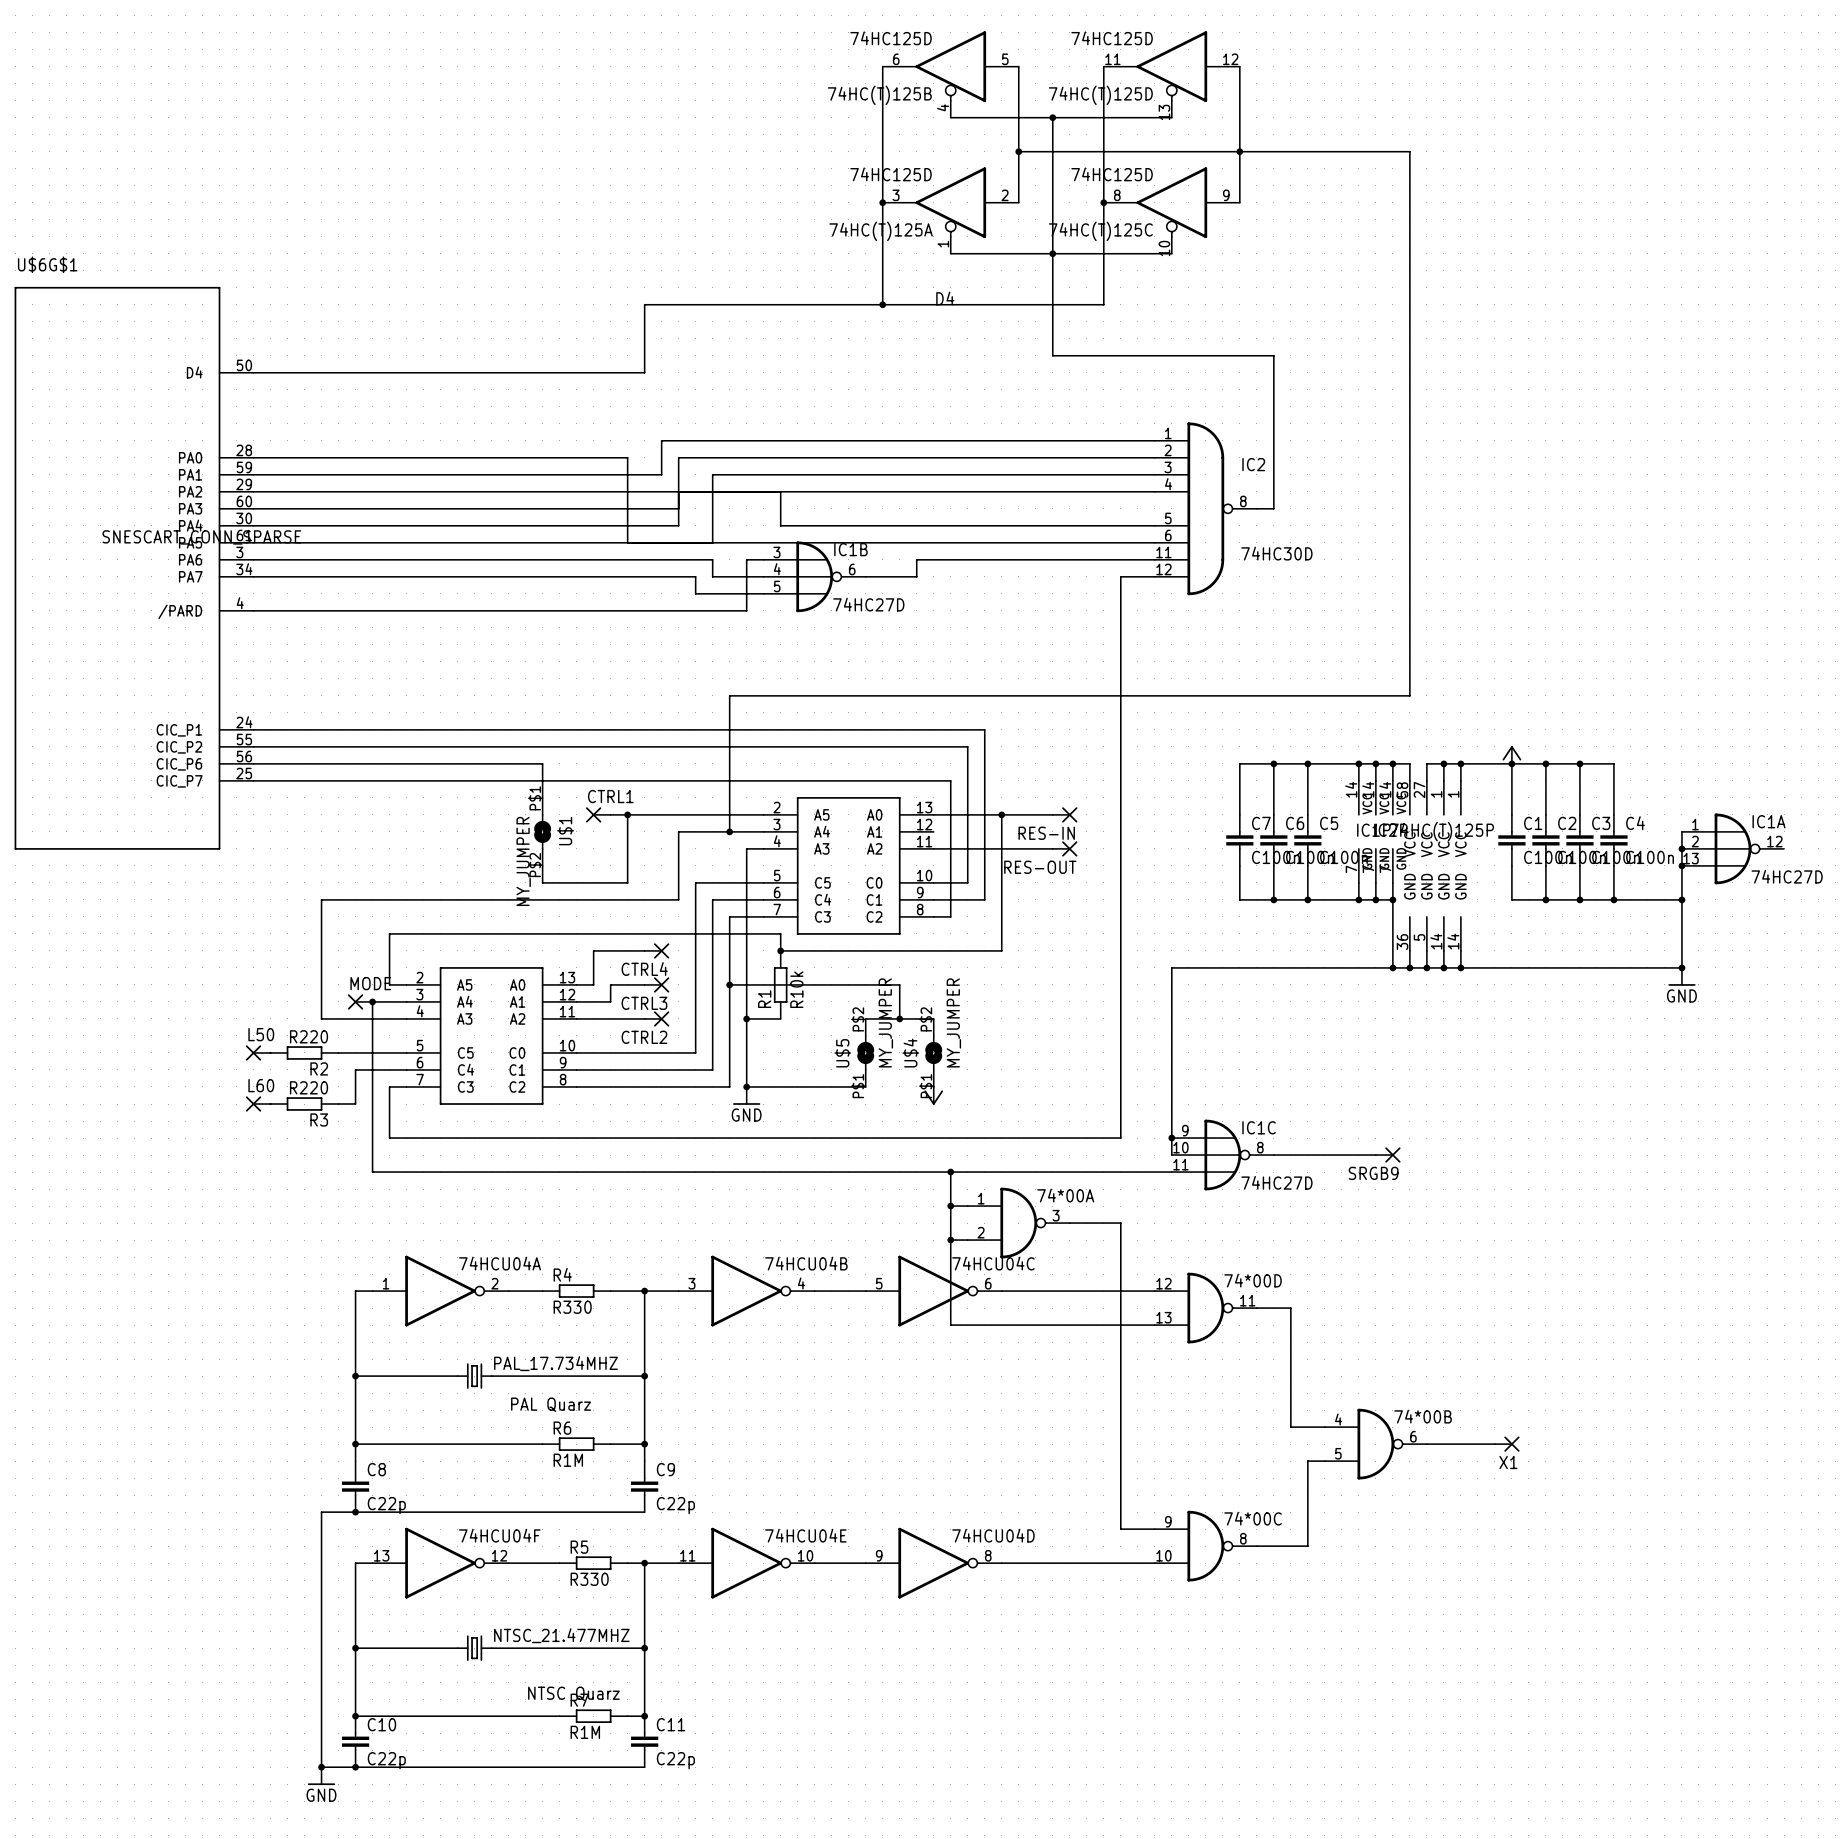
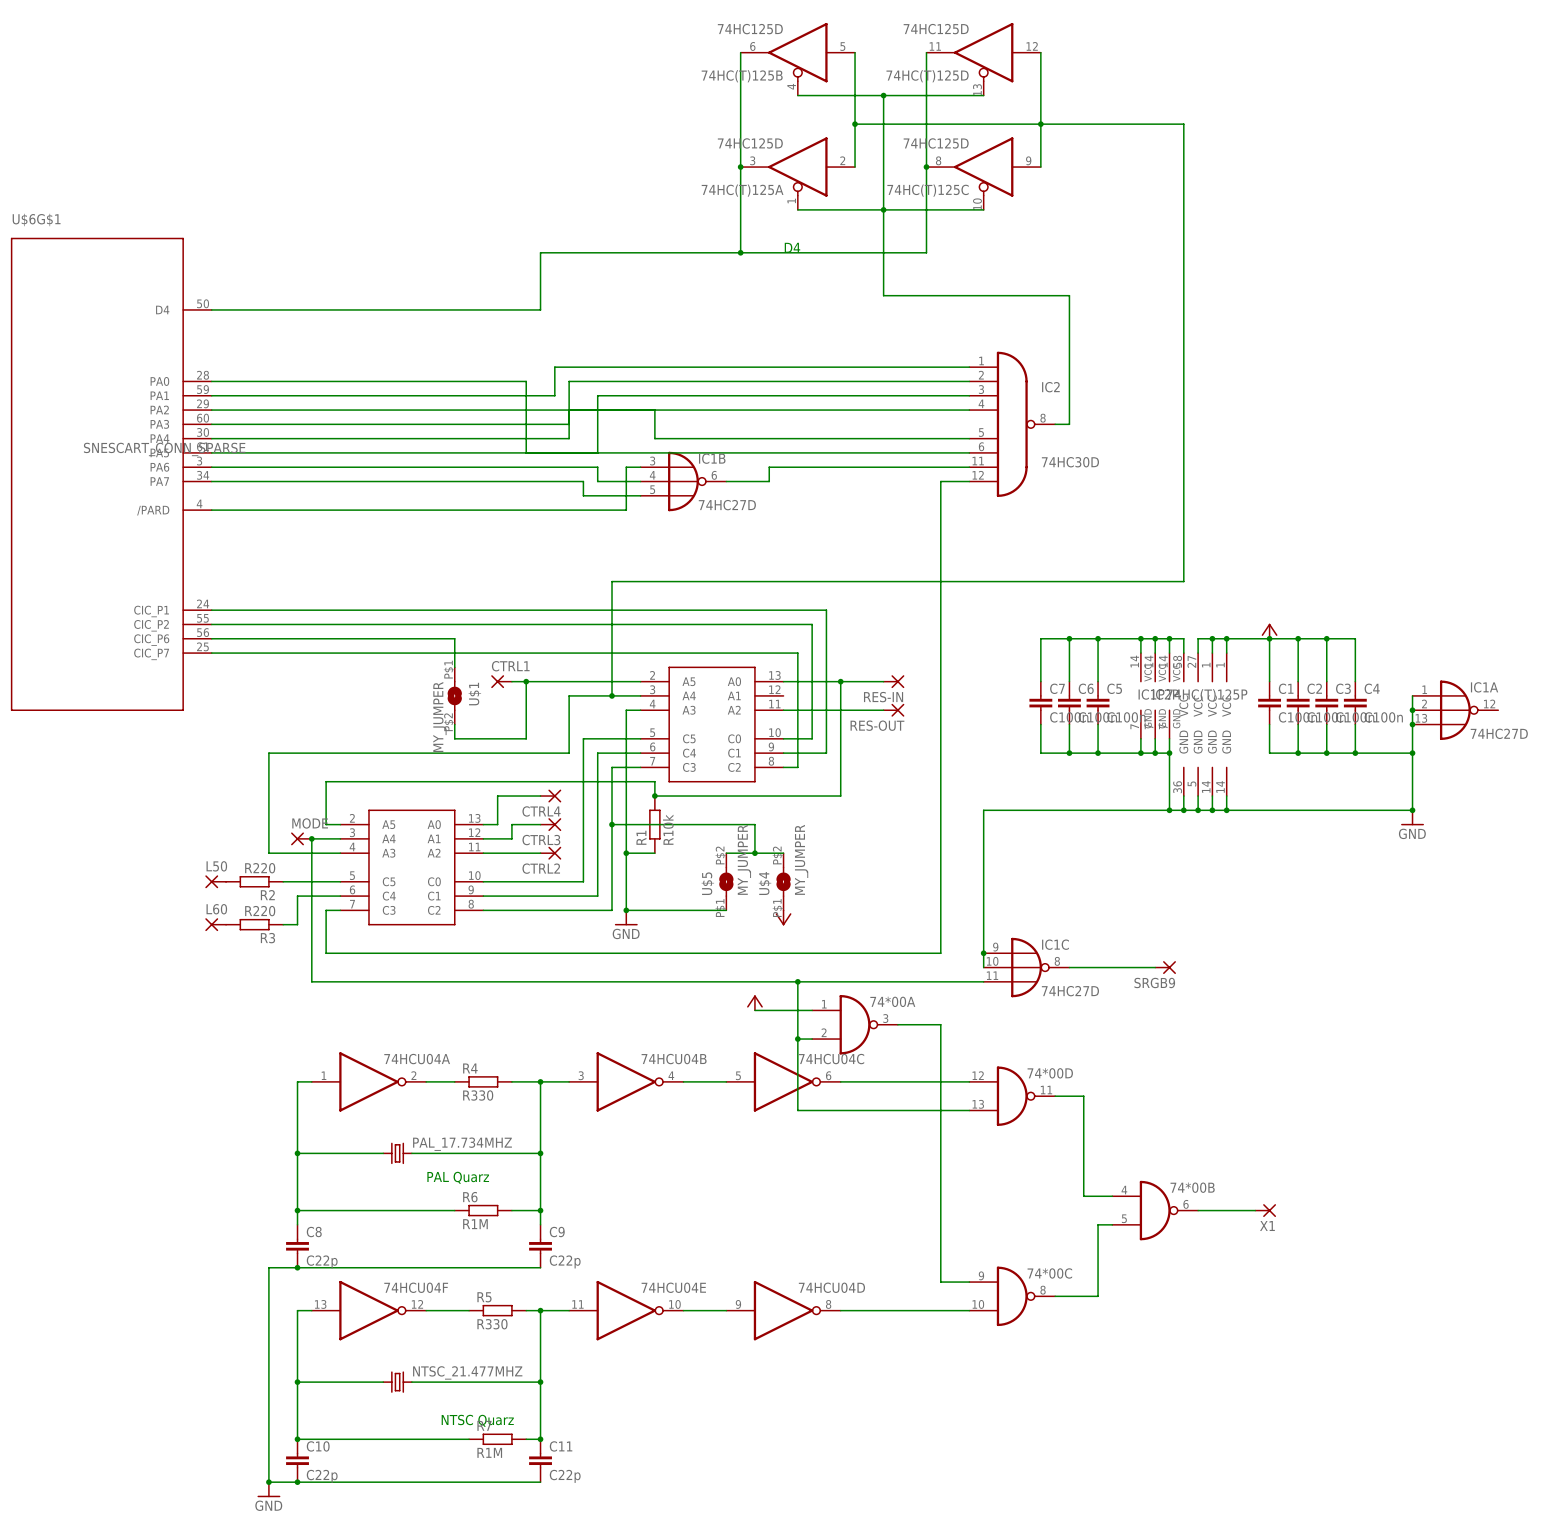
power symbol: none -> (754, 1002)
wire: none -> (754, 1010) (797, 1010)
junction: (950, 1206) -> none

